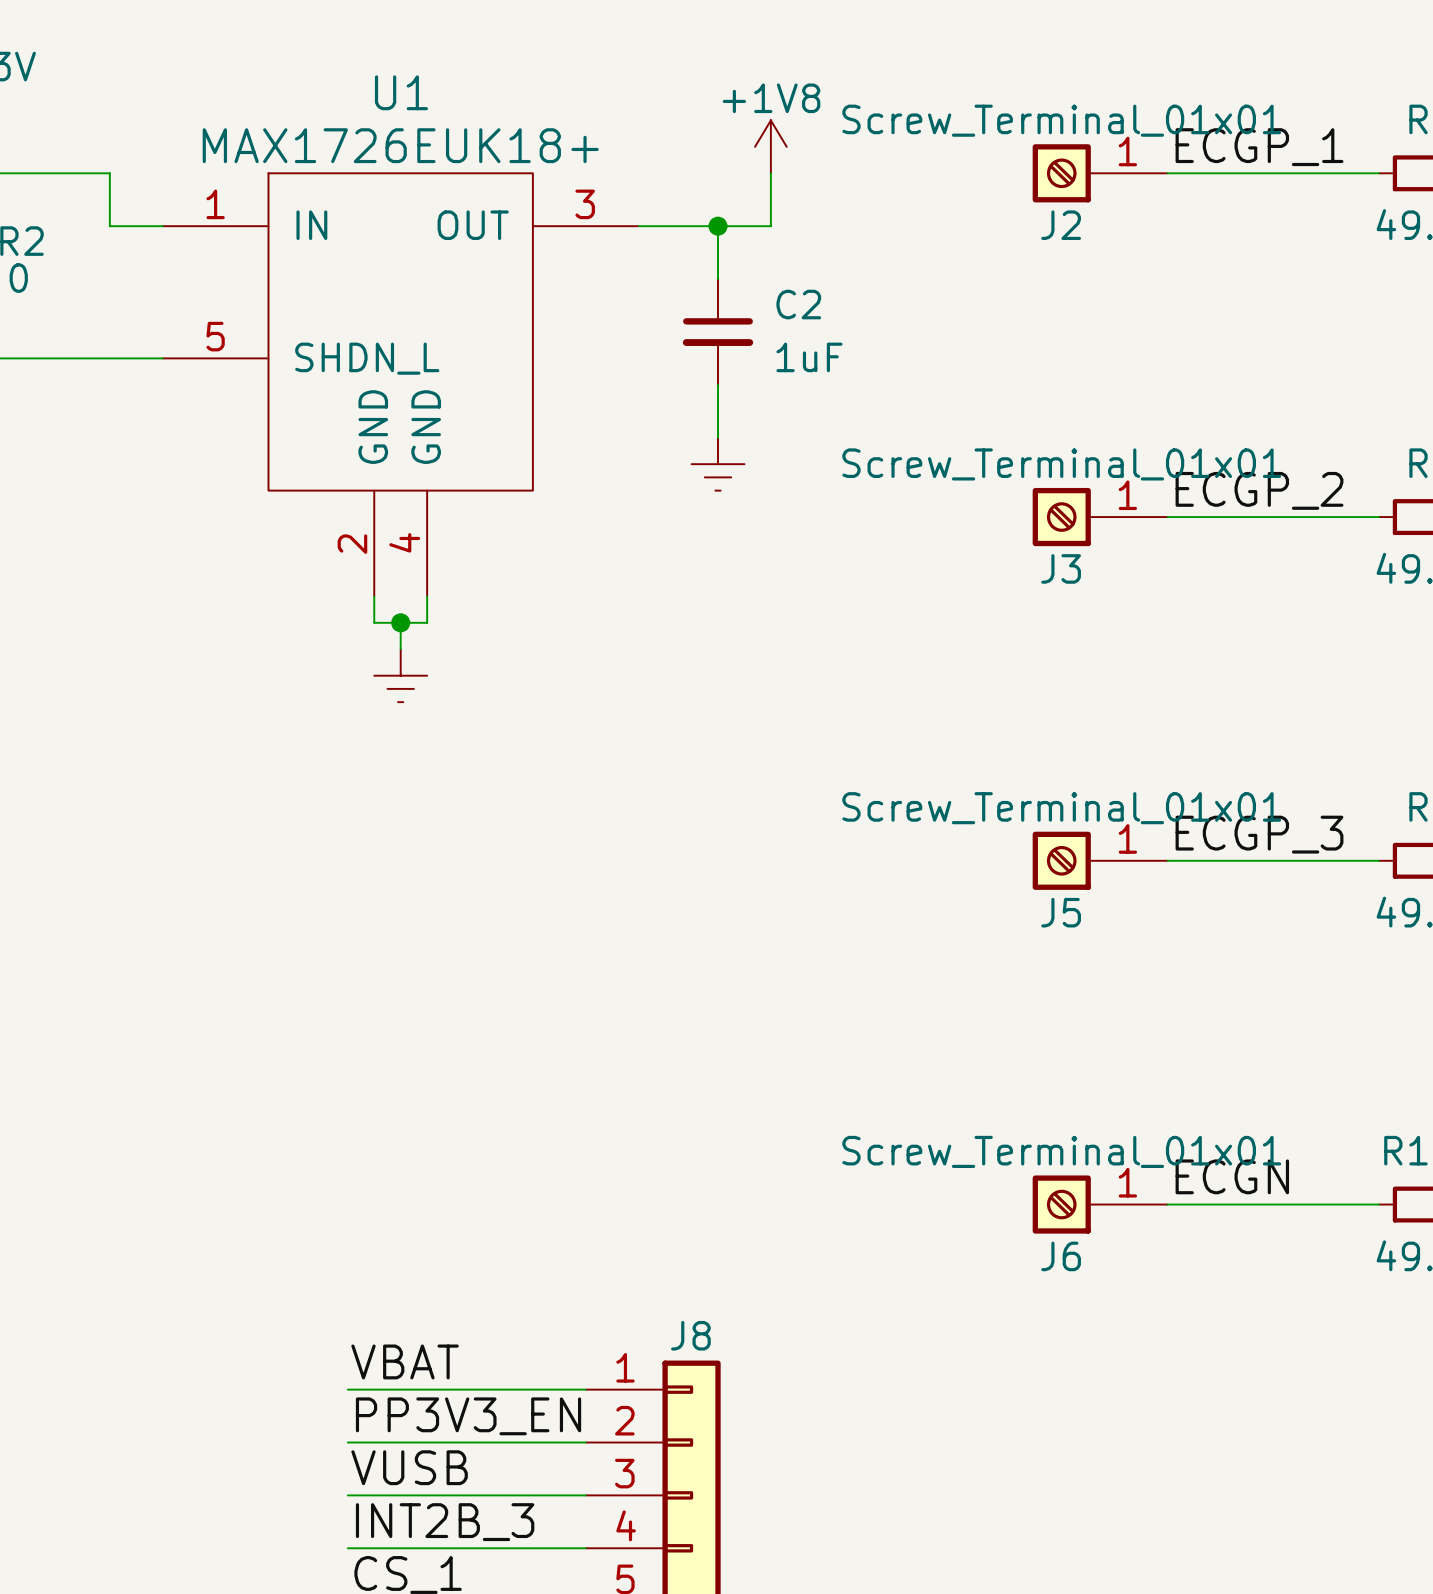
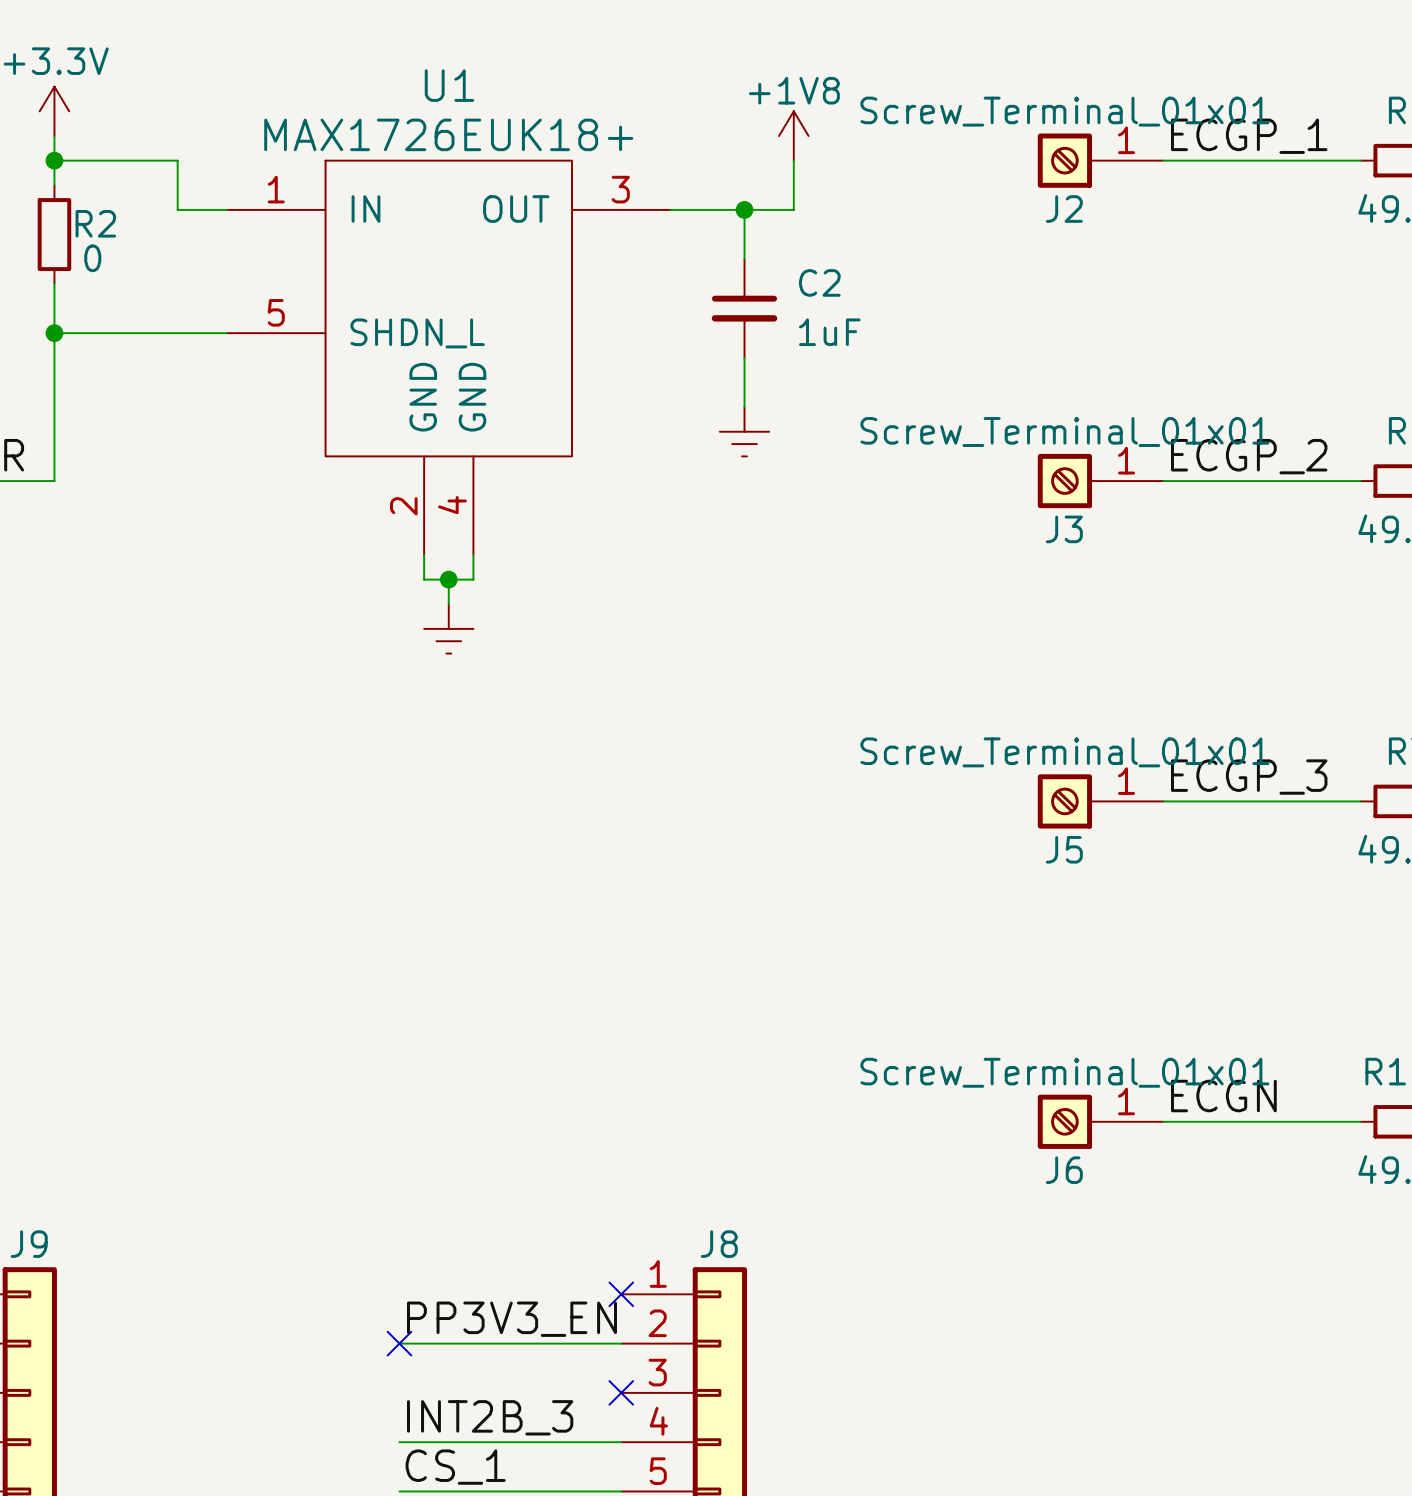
label: VBAT (405, 1361) -> none
wire: (347, 1389) (585, 1389) -> none
no-connect mark: none -> (621, 1294)
no-connect mark: none -> (399, 1343)
label: VUSB (409, 1467) -> none
wire: (347, 1495) (585, 1495) -> none
no-connect mark: none -> (621, 1392)

